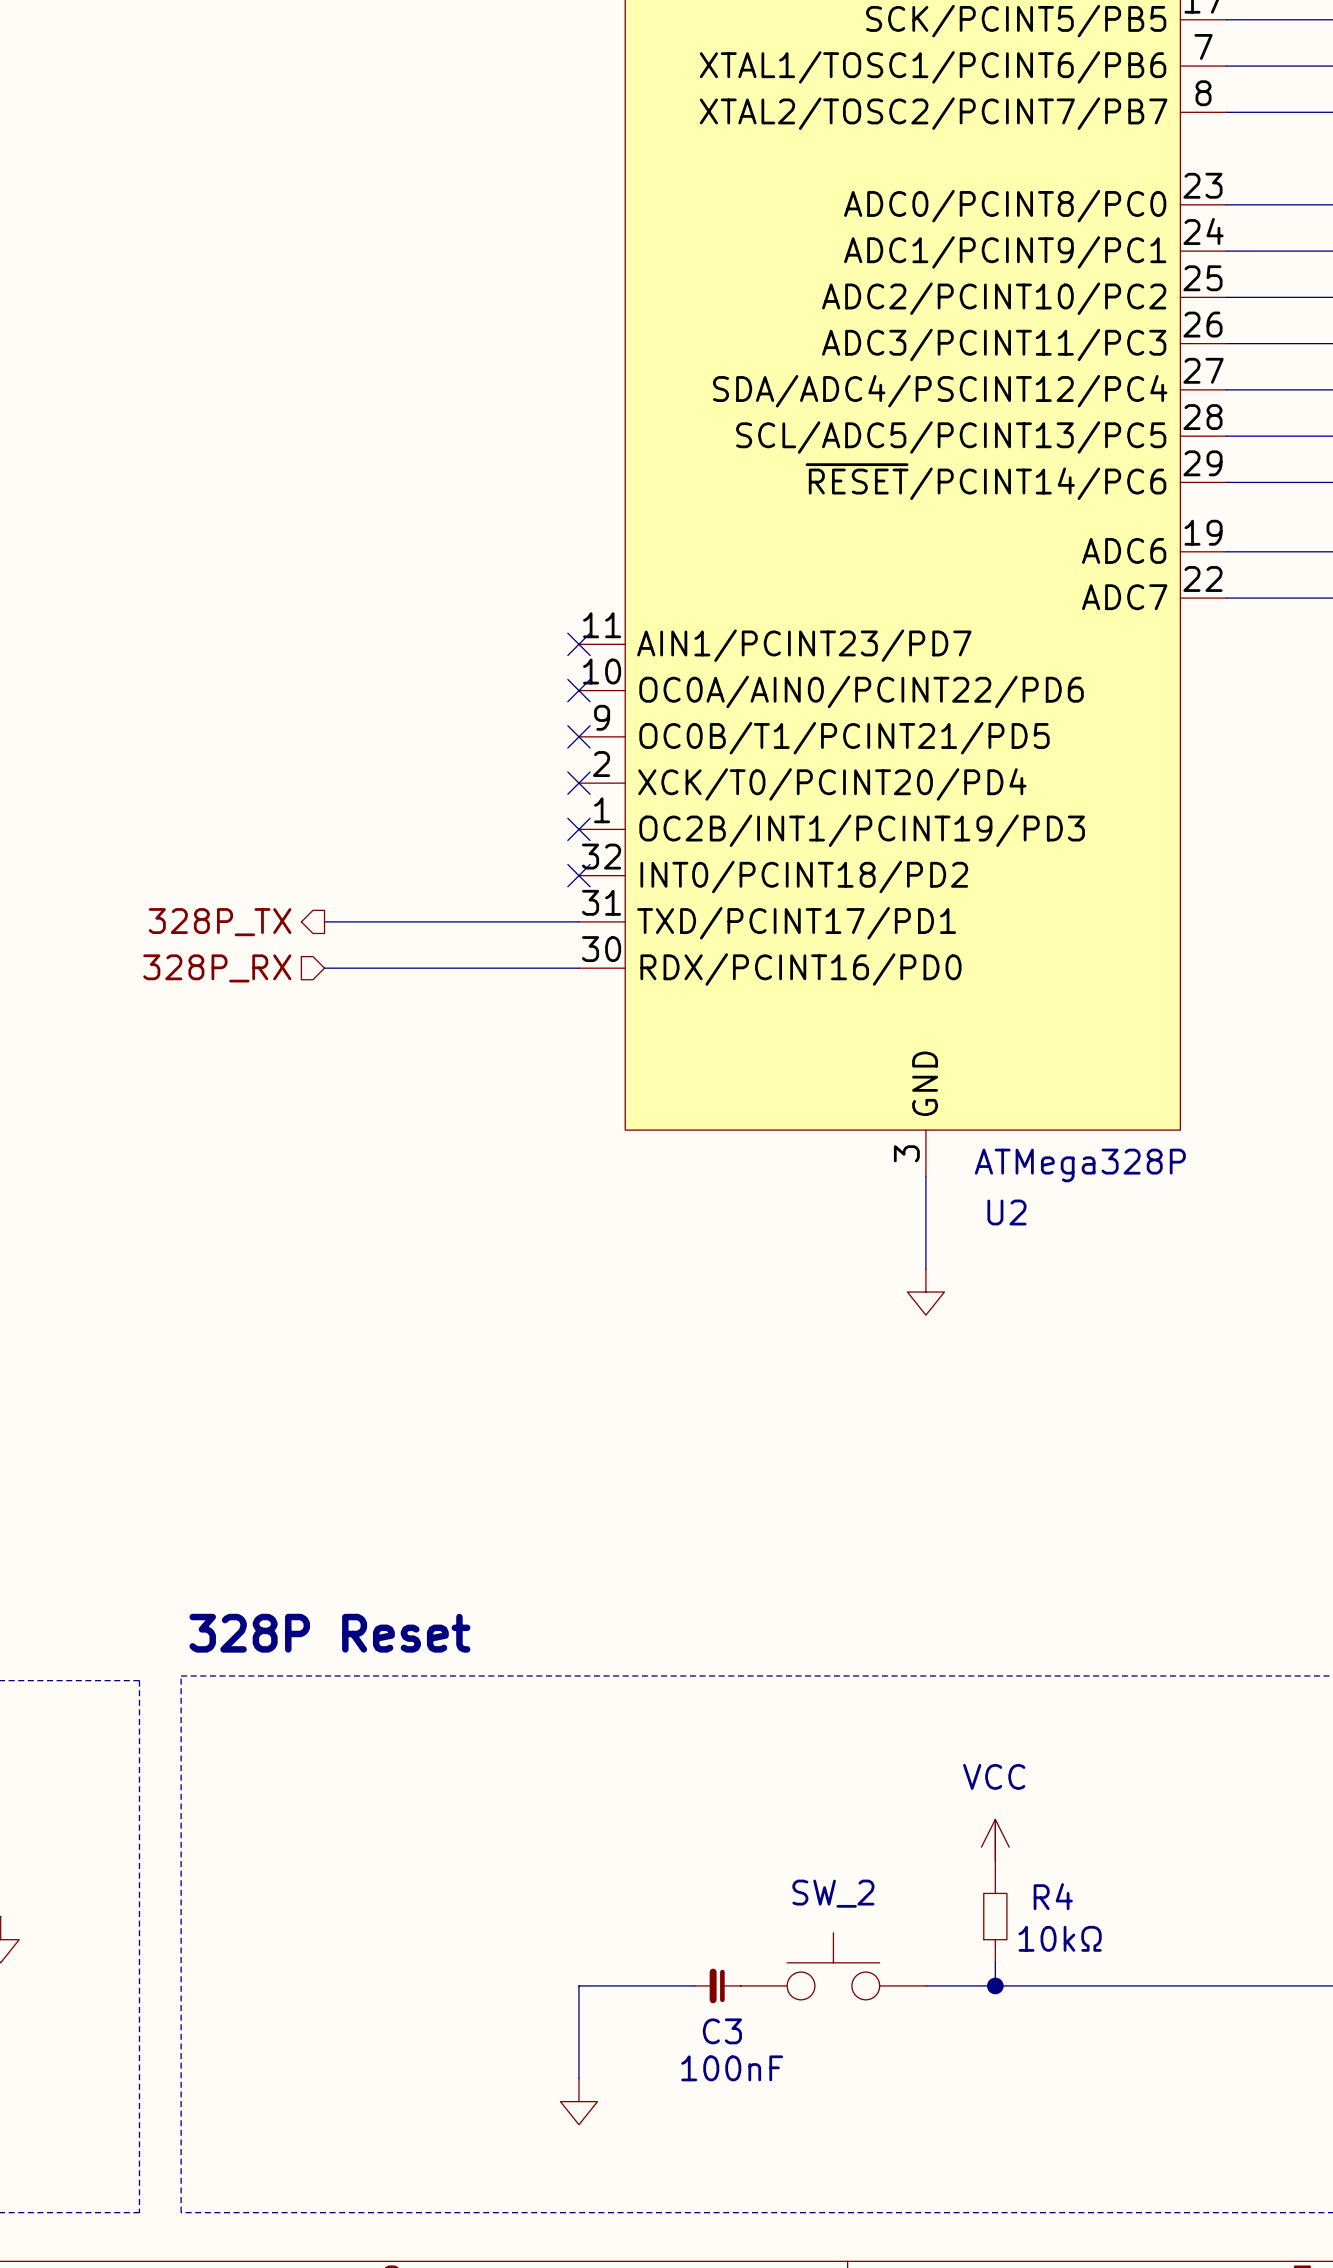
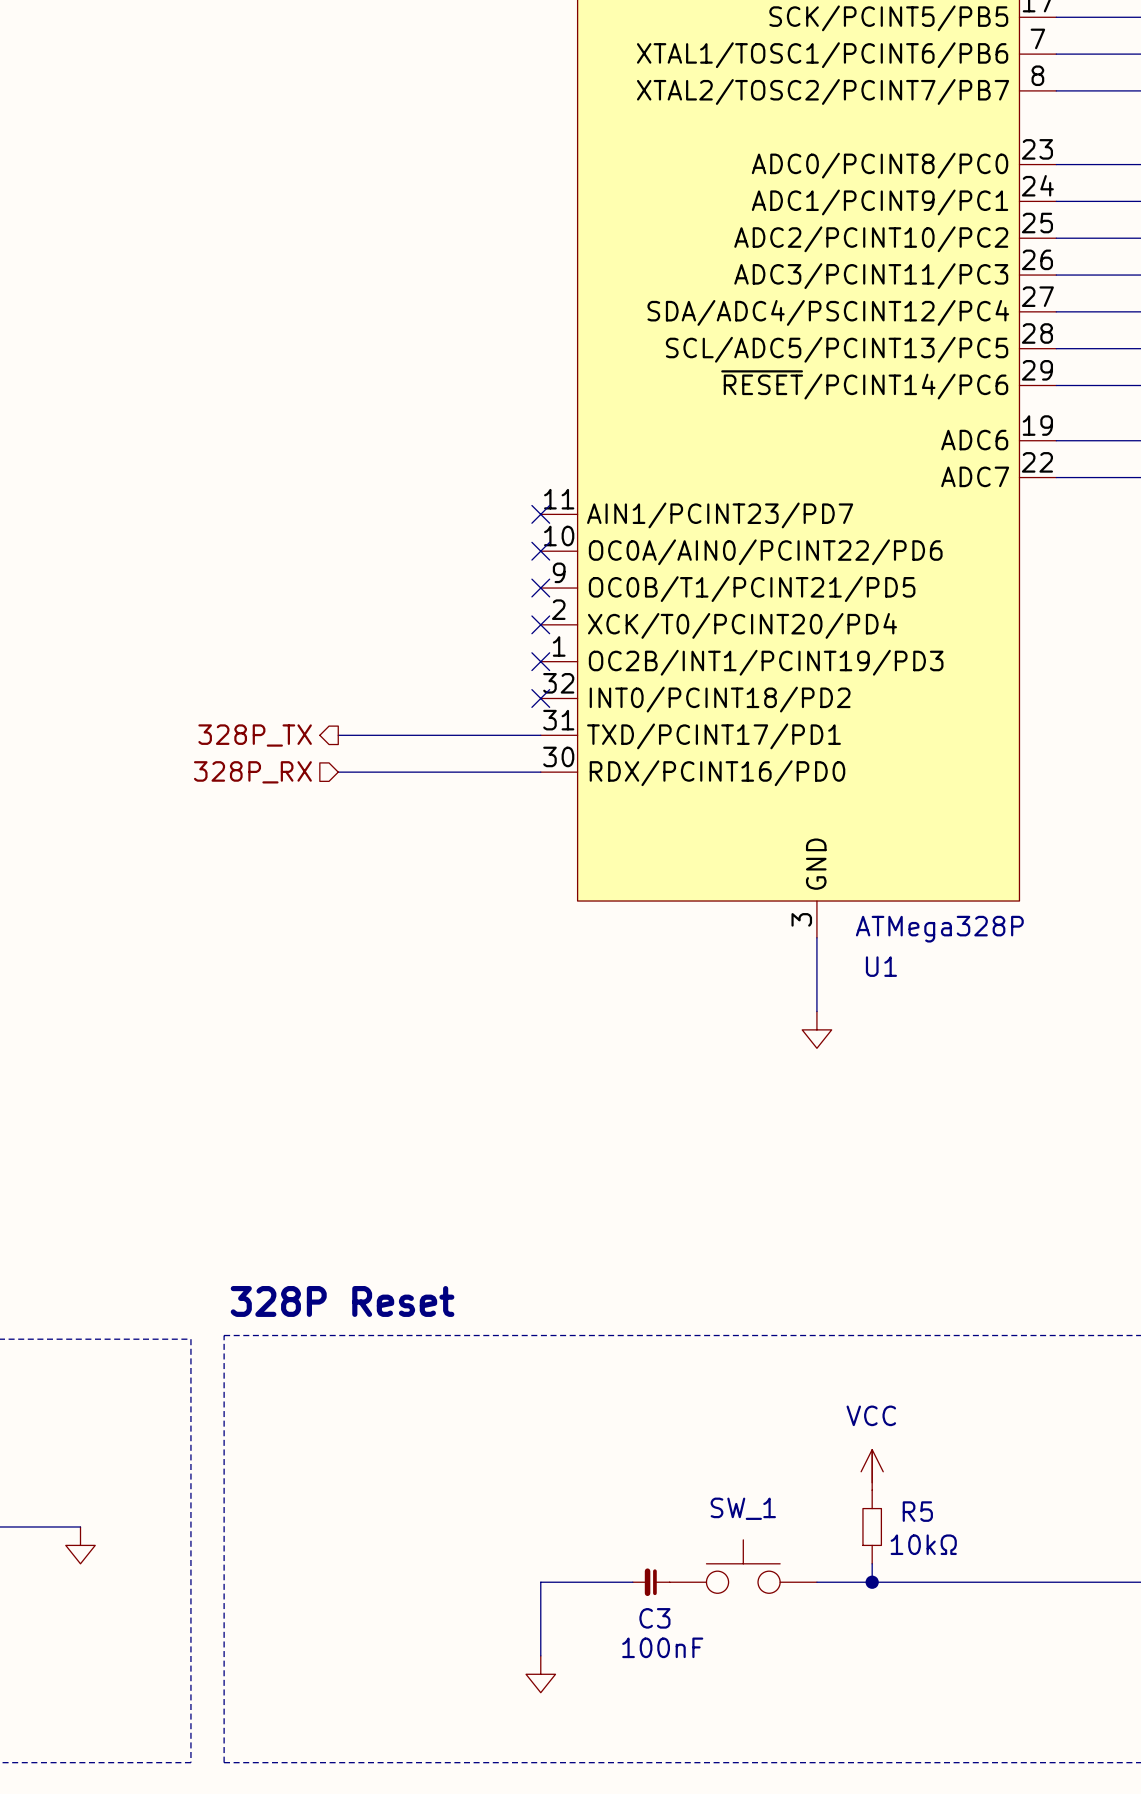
U2 name: U2 (1006, 1212) -> U1 (881, 966)
SW_2 name: SW_2 (833, 1893) -> SW_1 (743, 1508)
R4 name: R4 (1053, 1896) -> R5 (917, 1511)

